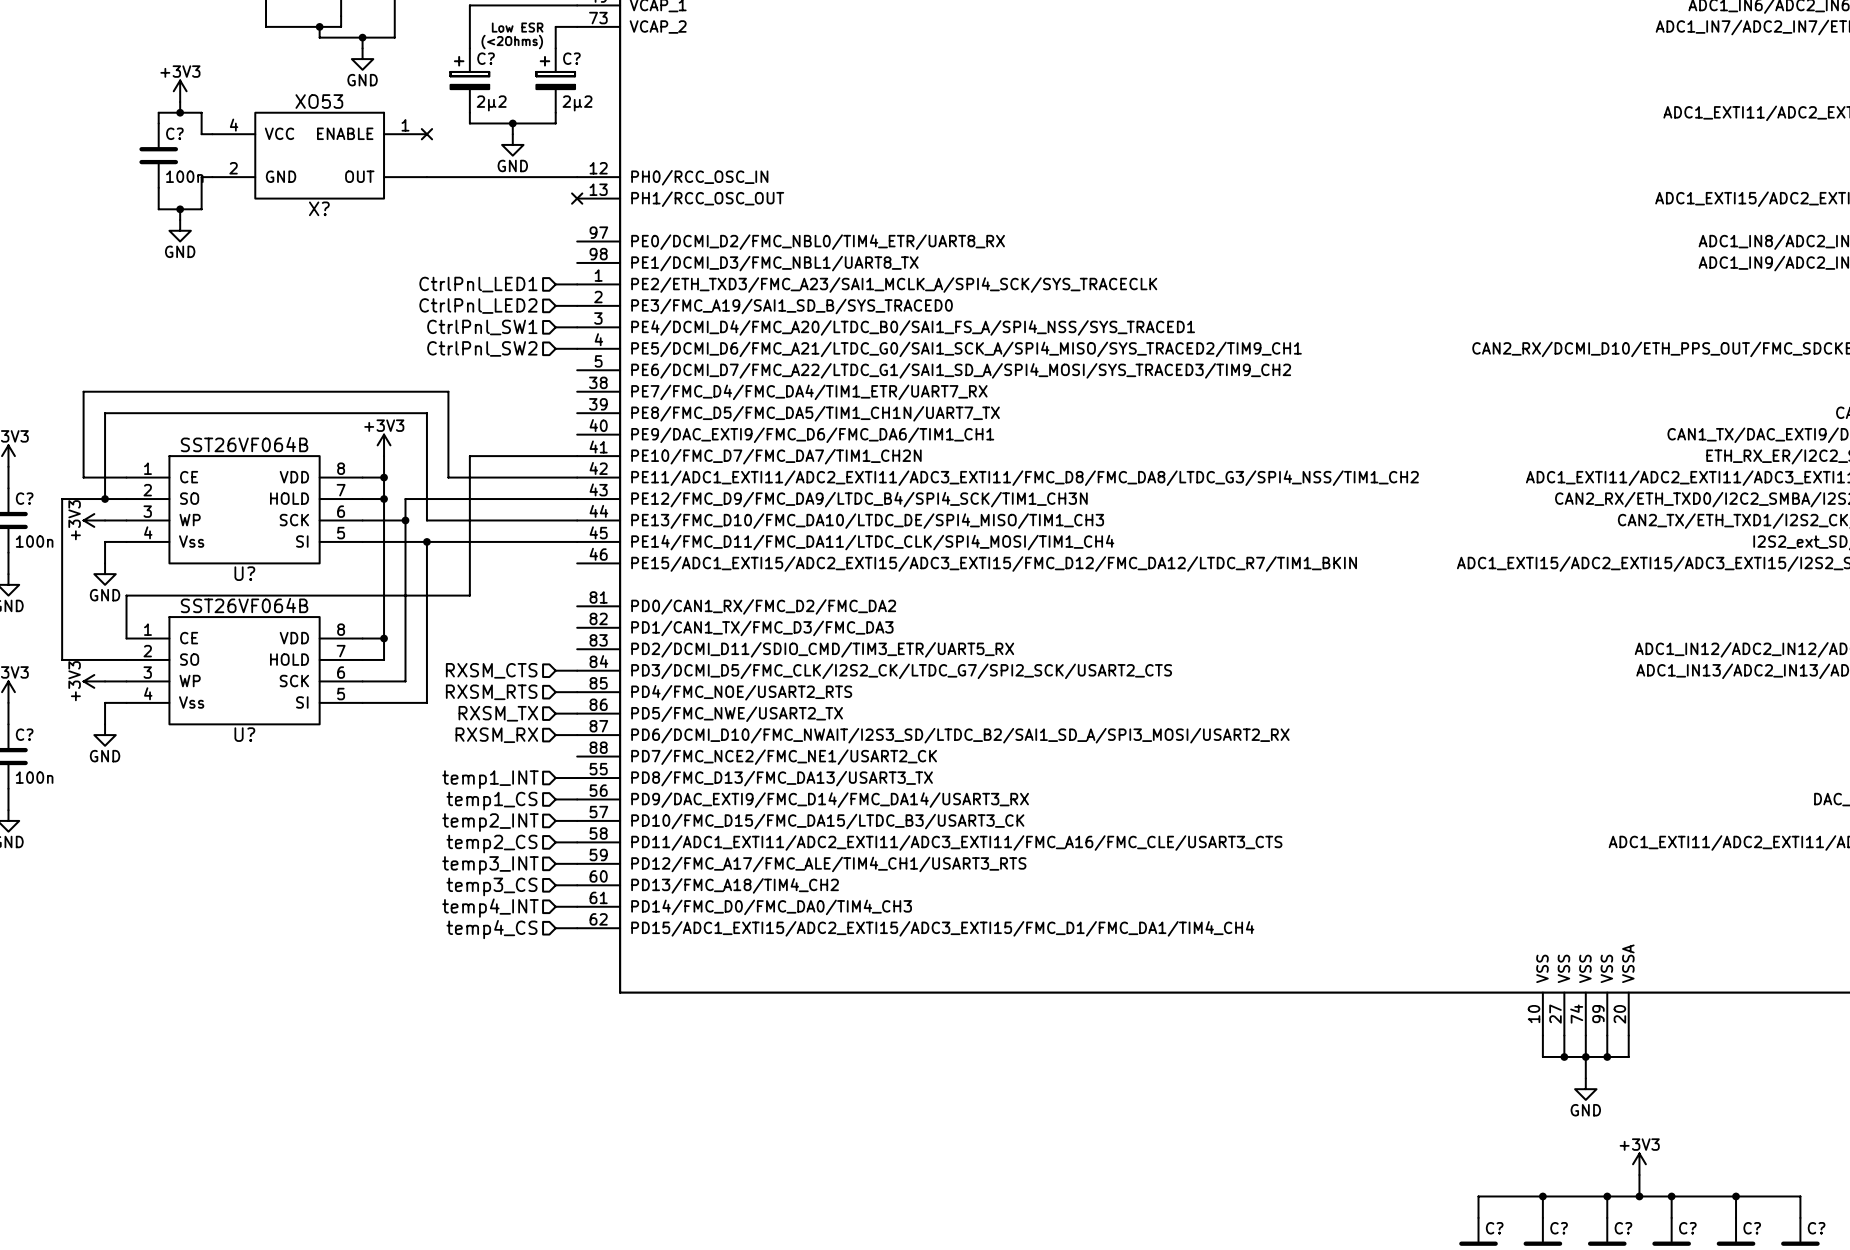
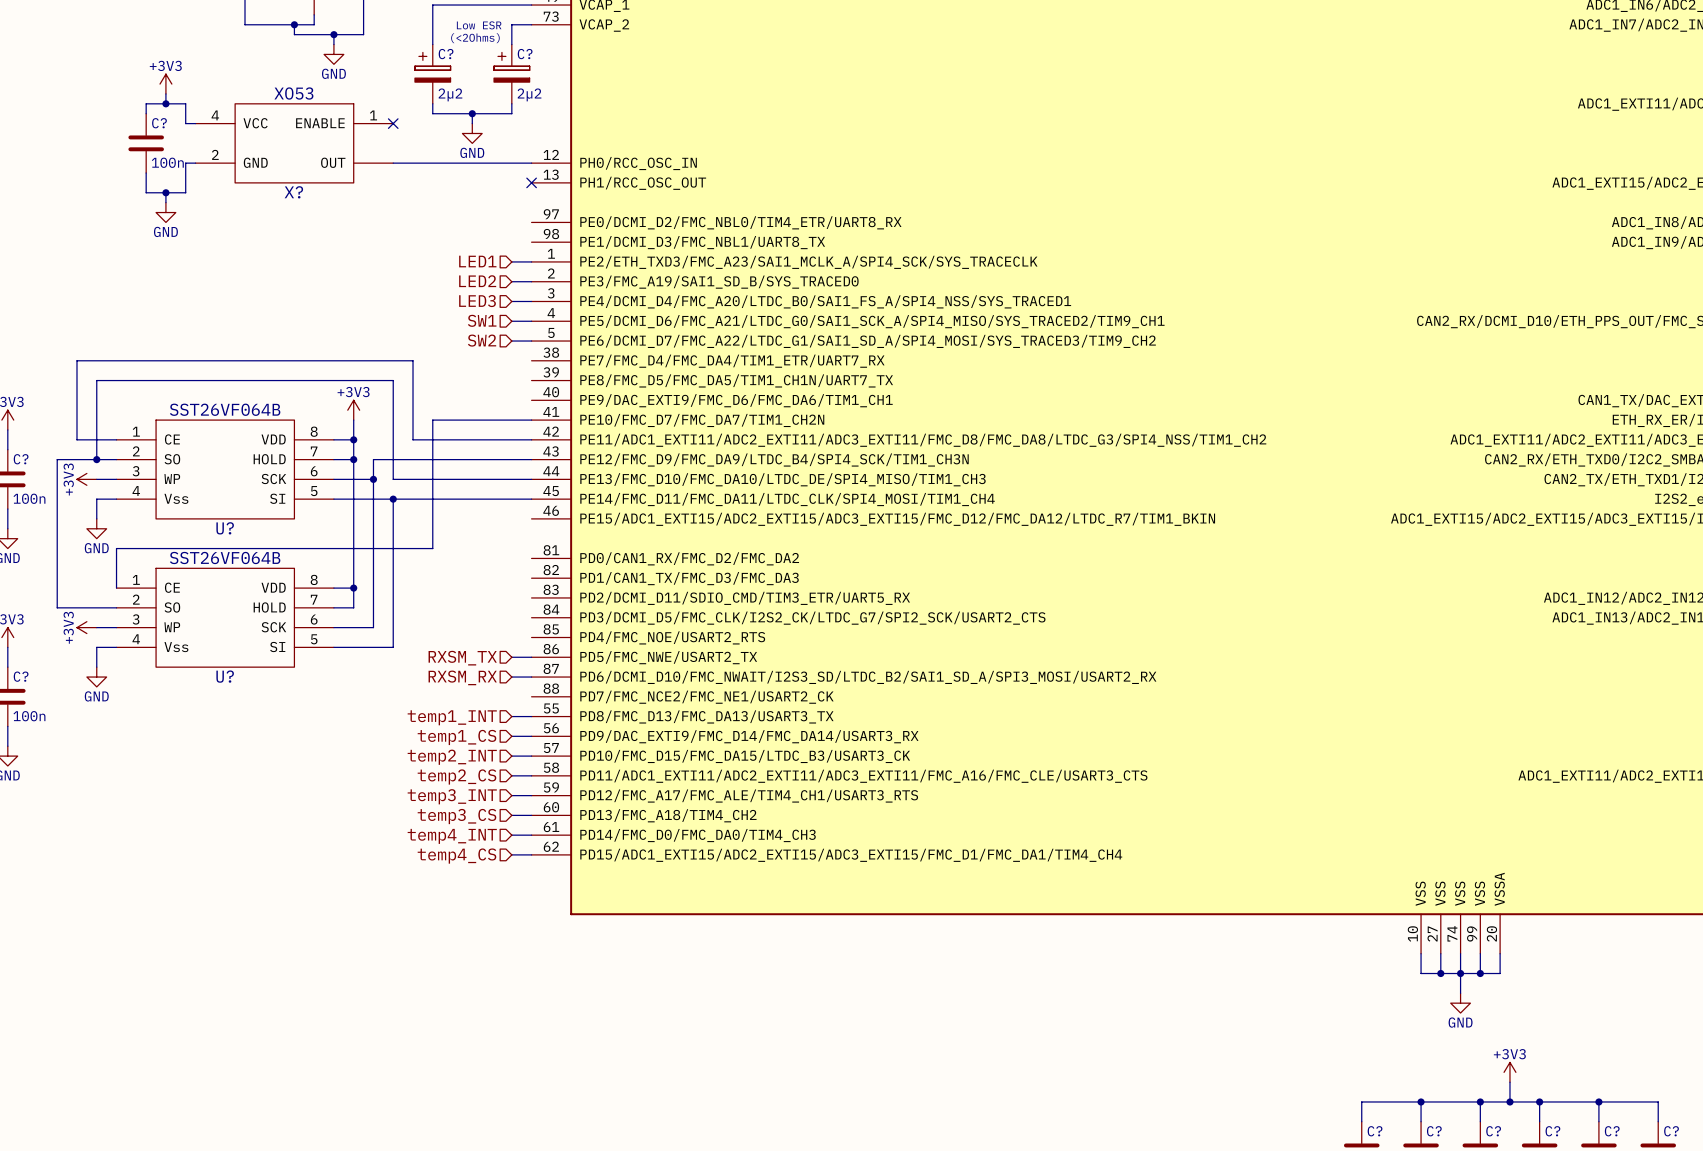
hierarchical label: CtrlPnl_LED1 (478, 284) -> LED1 (477, 261)
hierarchical label: CtrlPnl_LED2 (478, 306) -> LED2 (477, 281)
hierarchical label: CtrlPnl_SW1 (482, 327) -> LED3 (477, 301)
hierarchical label: CtrlPnl_SW2 (482, 348) -> SW1 (482, 320)
hierarchical label: none -> SW2 (482, 340)
wire: none -> (511, 341) (531, 341)
hierarchical label: RXSM_CTS (491, 670) -> none
wire: (555, 670) (577, 670) -> none
hierarchical label: RXSM_RTS (491, 692) -> none
wire: (555, 692) (577, 692) -> none

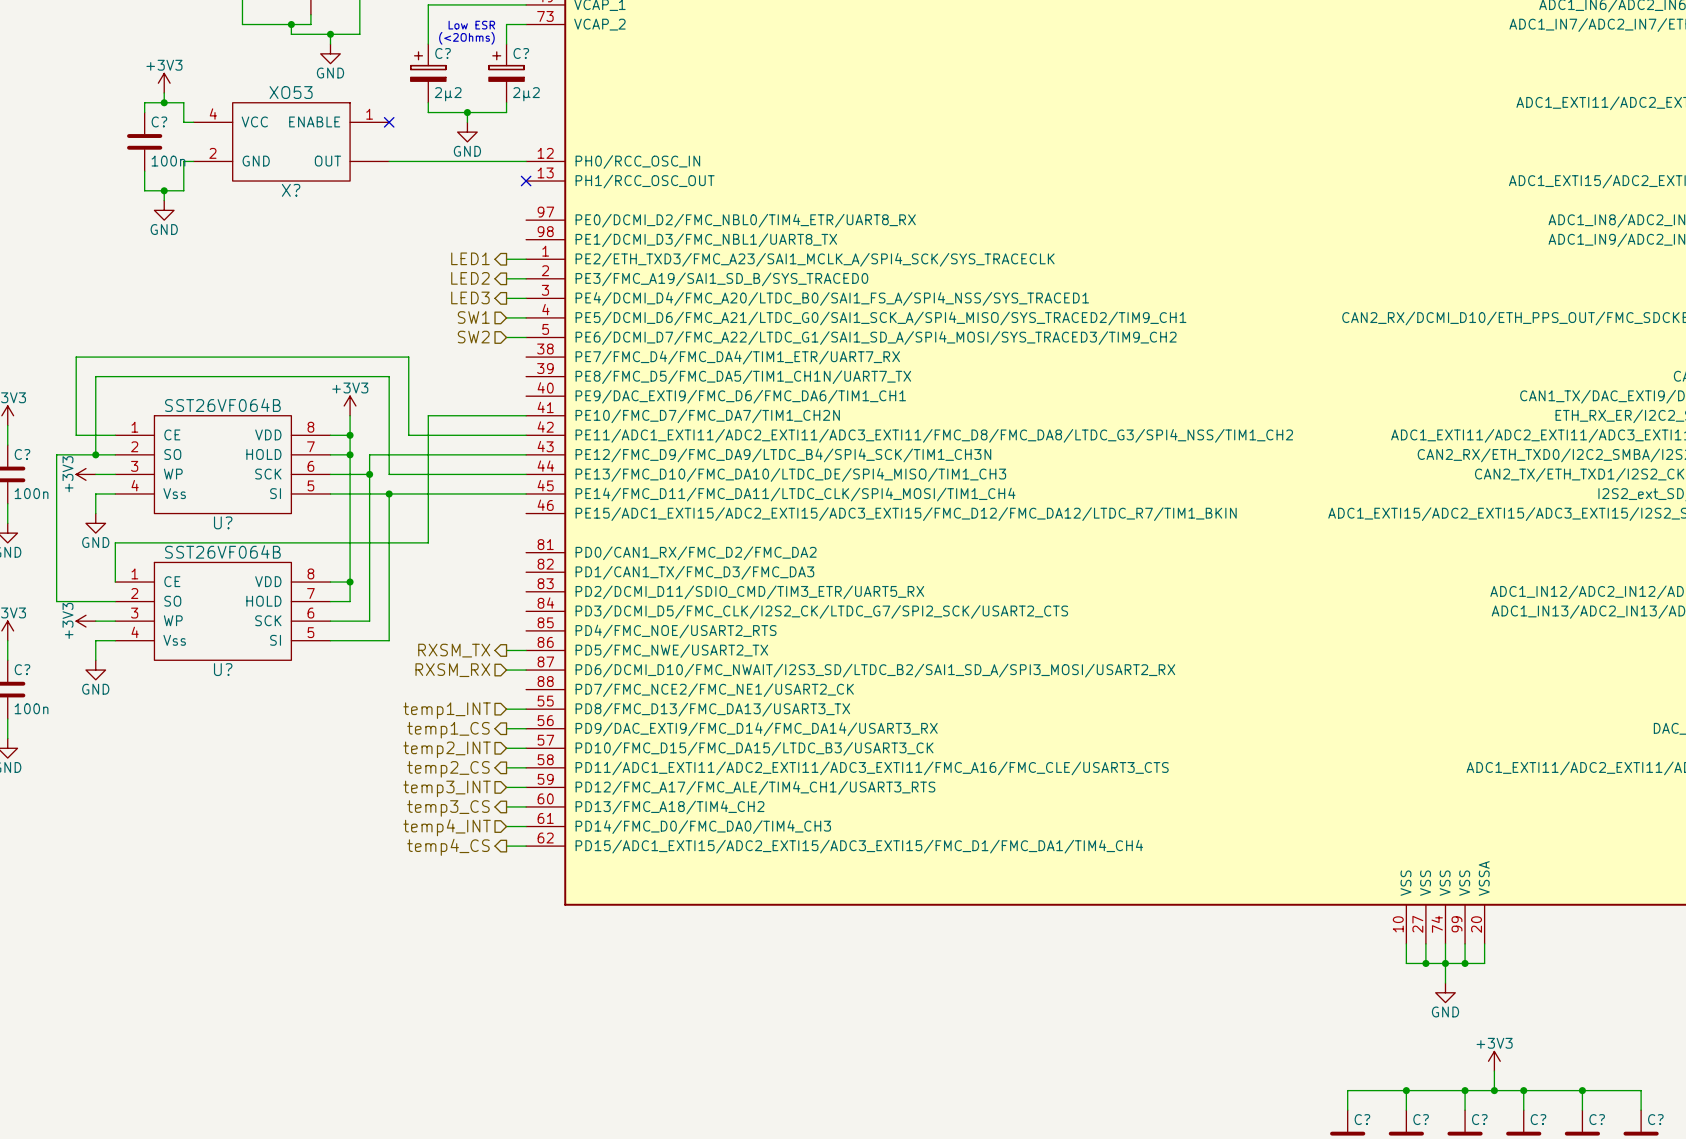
hierarchical label shape: input (477, 261) -> output (470, 258)
hierarchical label shape: input (477, 281) -> output (470, 278)
hierarchical label shape: input (477, 301) -> output (470, 297)
hierarchical label shape: input (462, 658) -> output (454, 650)
hierarchical label shape: input (456, 737) -> output (448, 730)
hierarchical label shape: input (456, 776) -> output (448, 769)
hierarchical label shape: input (456, 816) -> output (448, 808)
hierarchical label shape: input (456, 856) -> output (448, 847)

